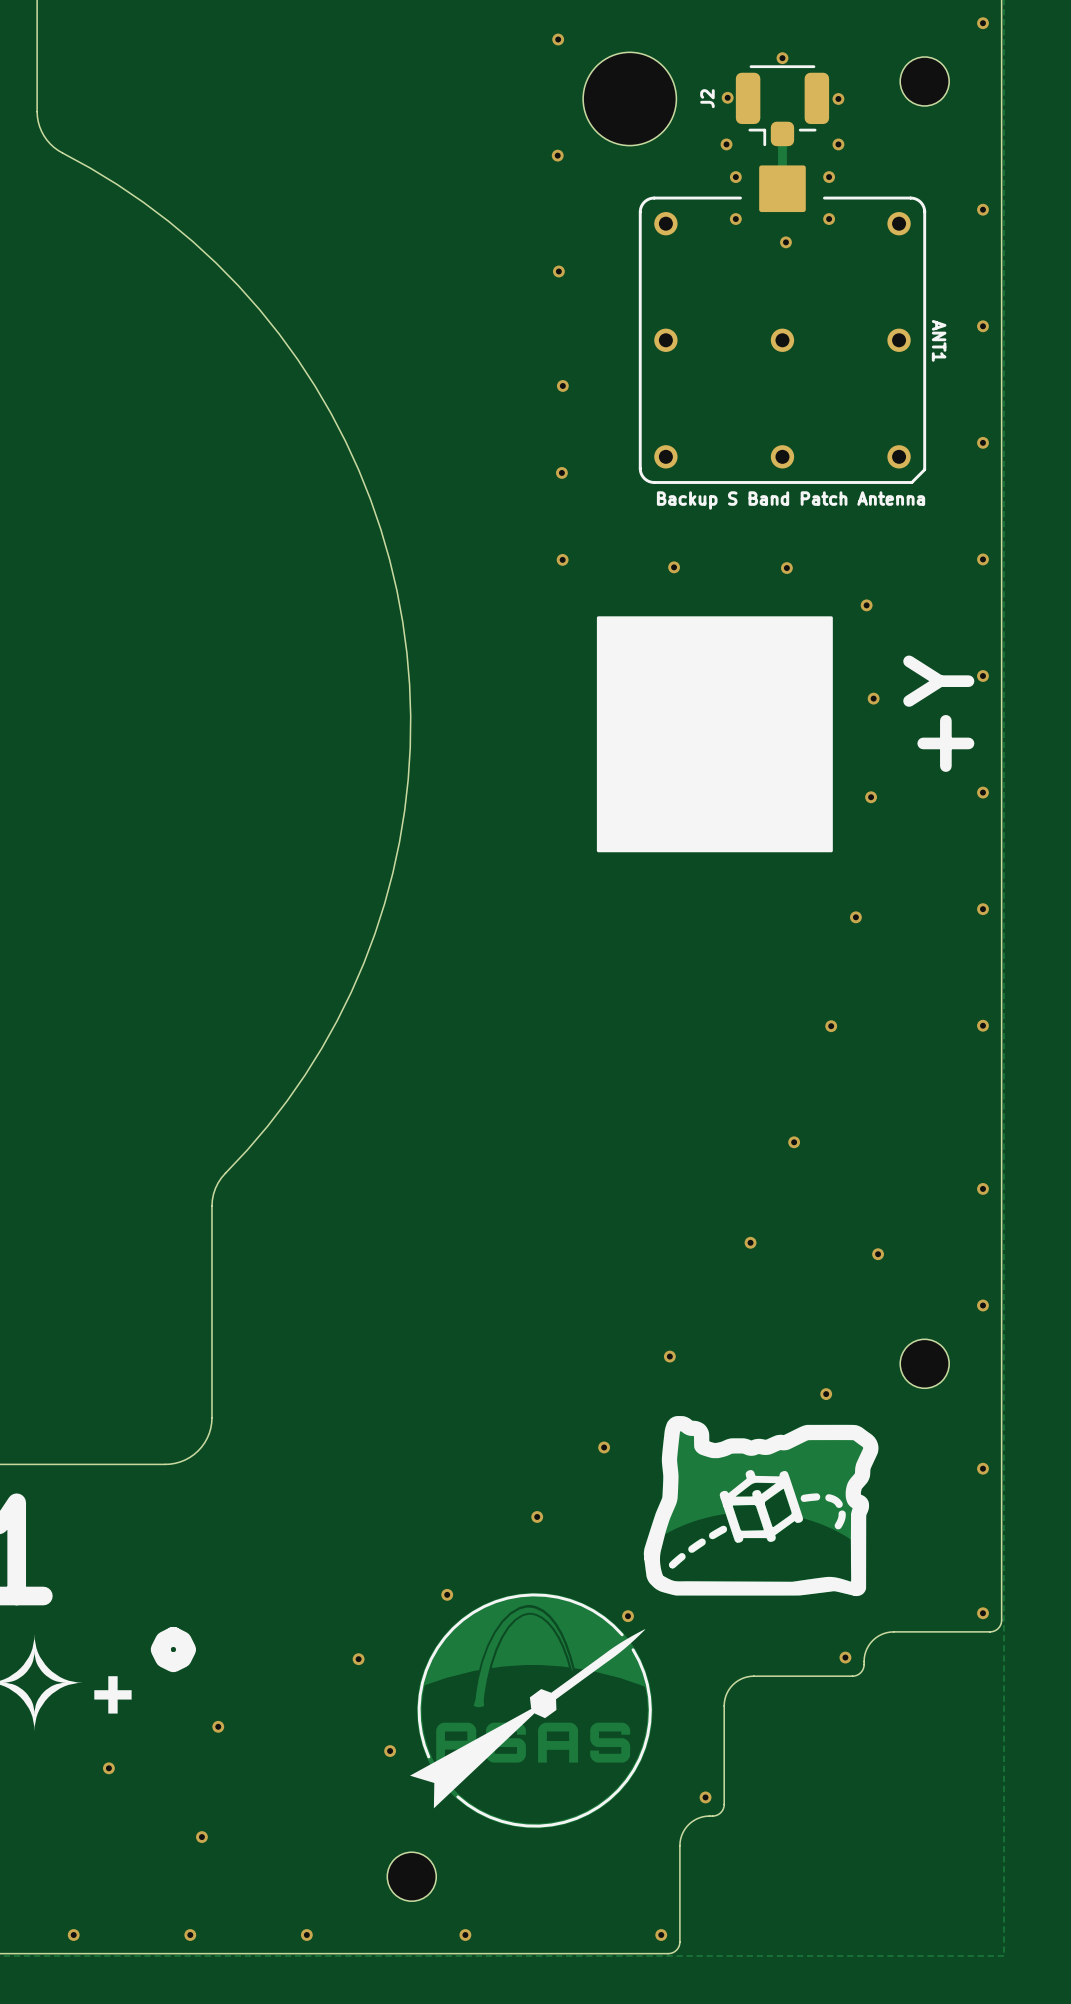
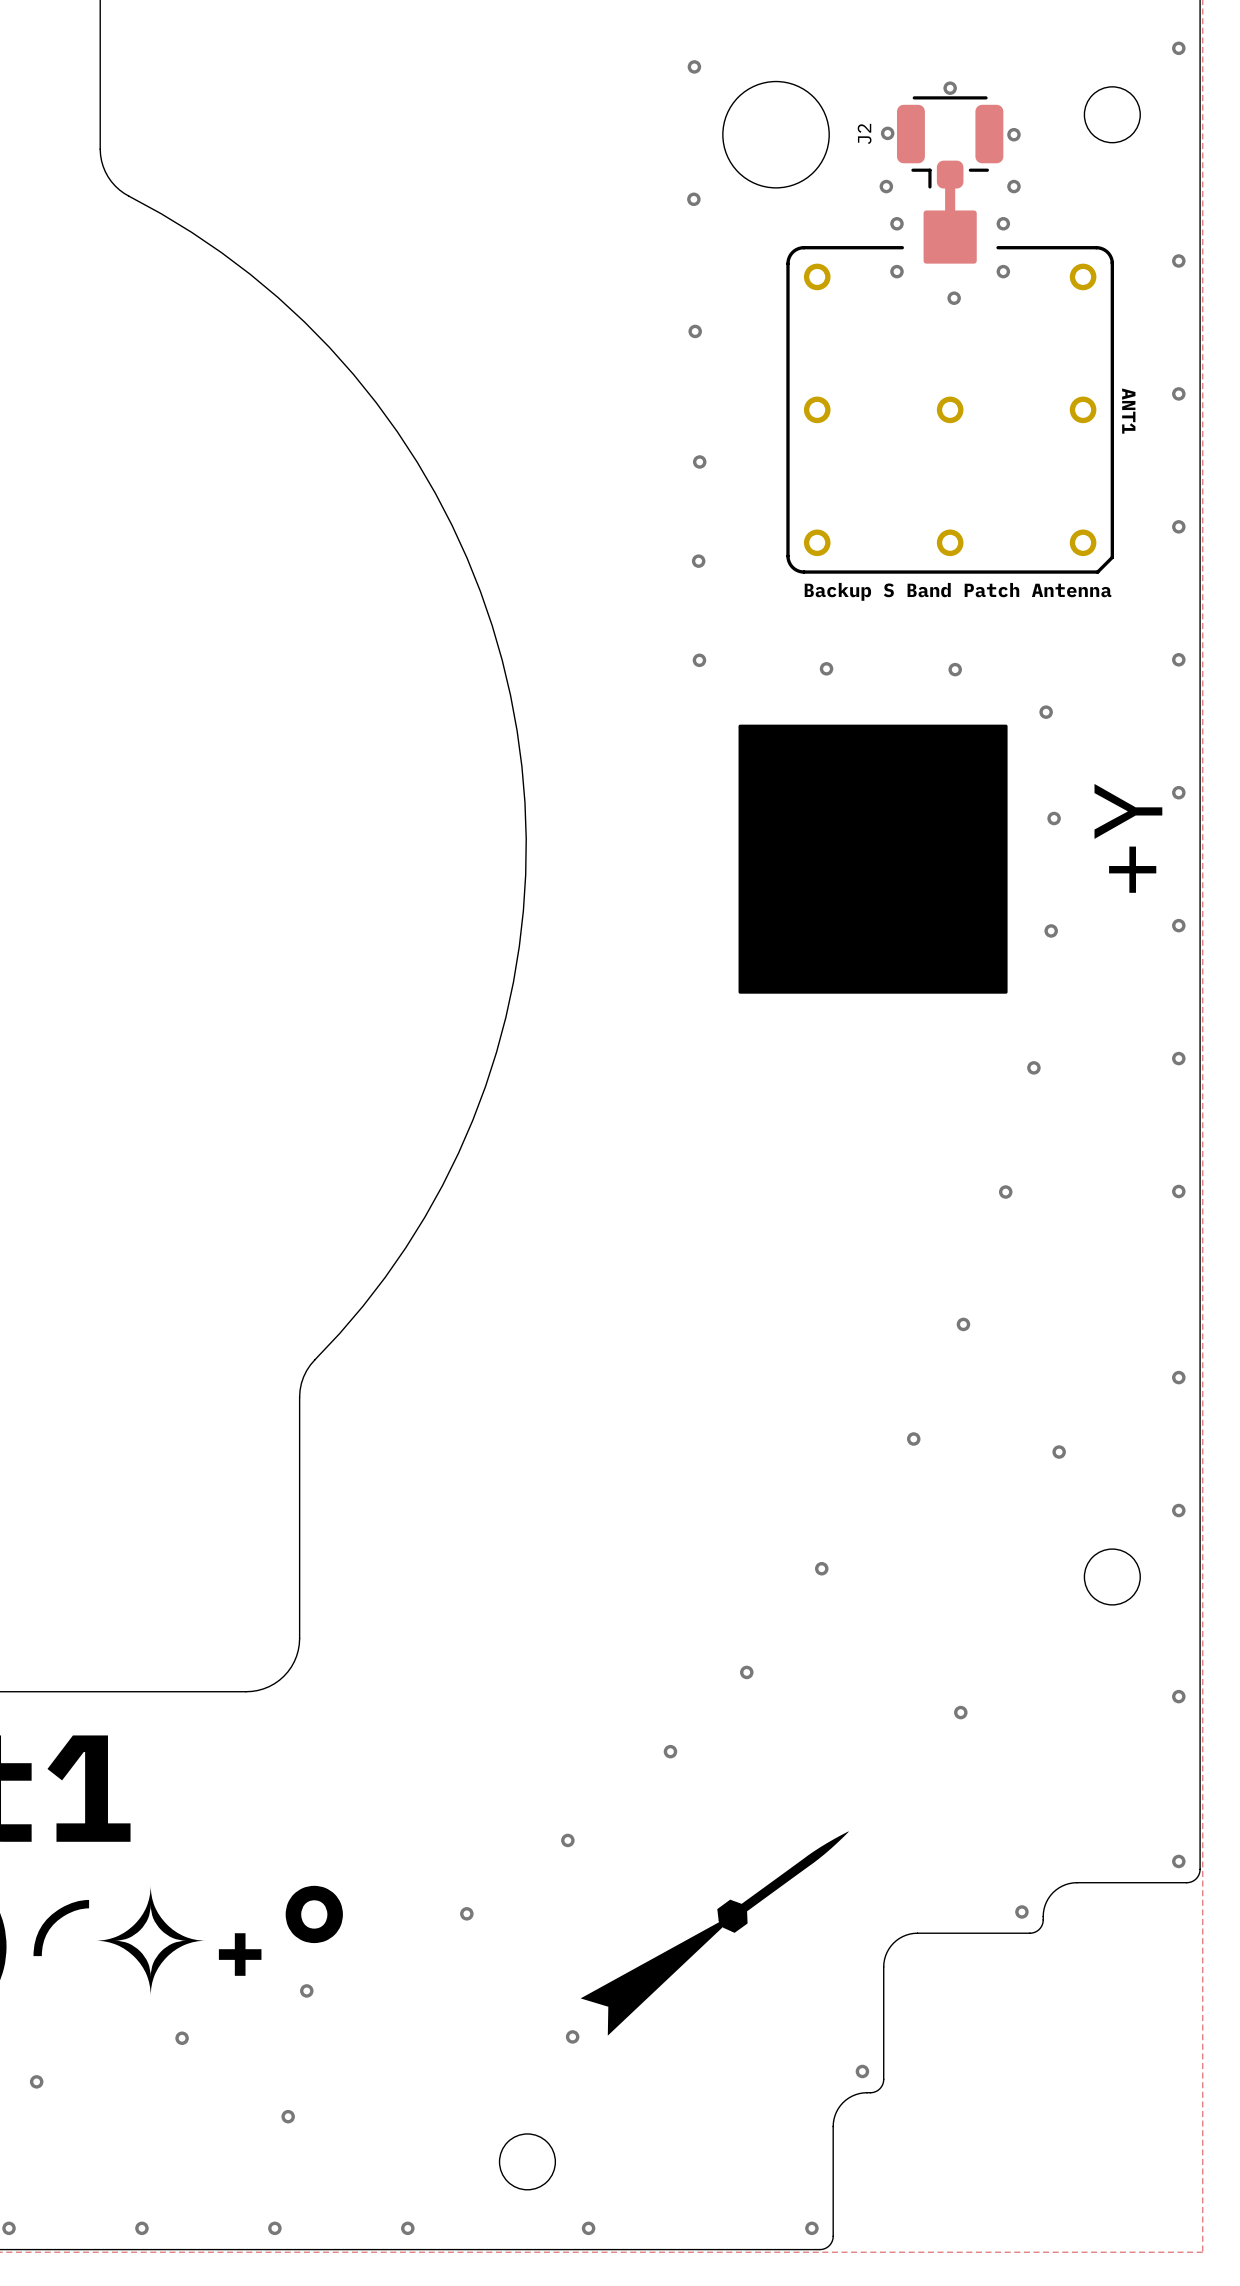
via position: (826, 1394) -> (960, 1712)
drawing: [410, 1415, 879, 1829] -> none
drawing: none -> [580, 1831, 849, 2036]
via: (628, 1616) -> none
via position: (390, 1751) -> (572, 2036)

